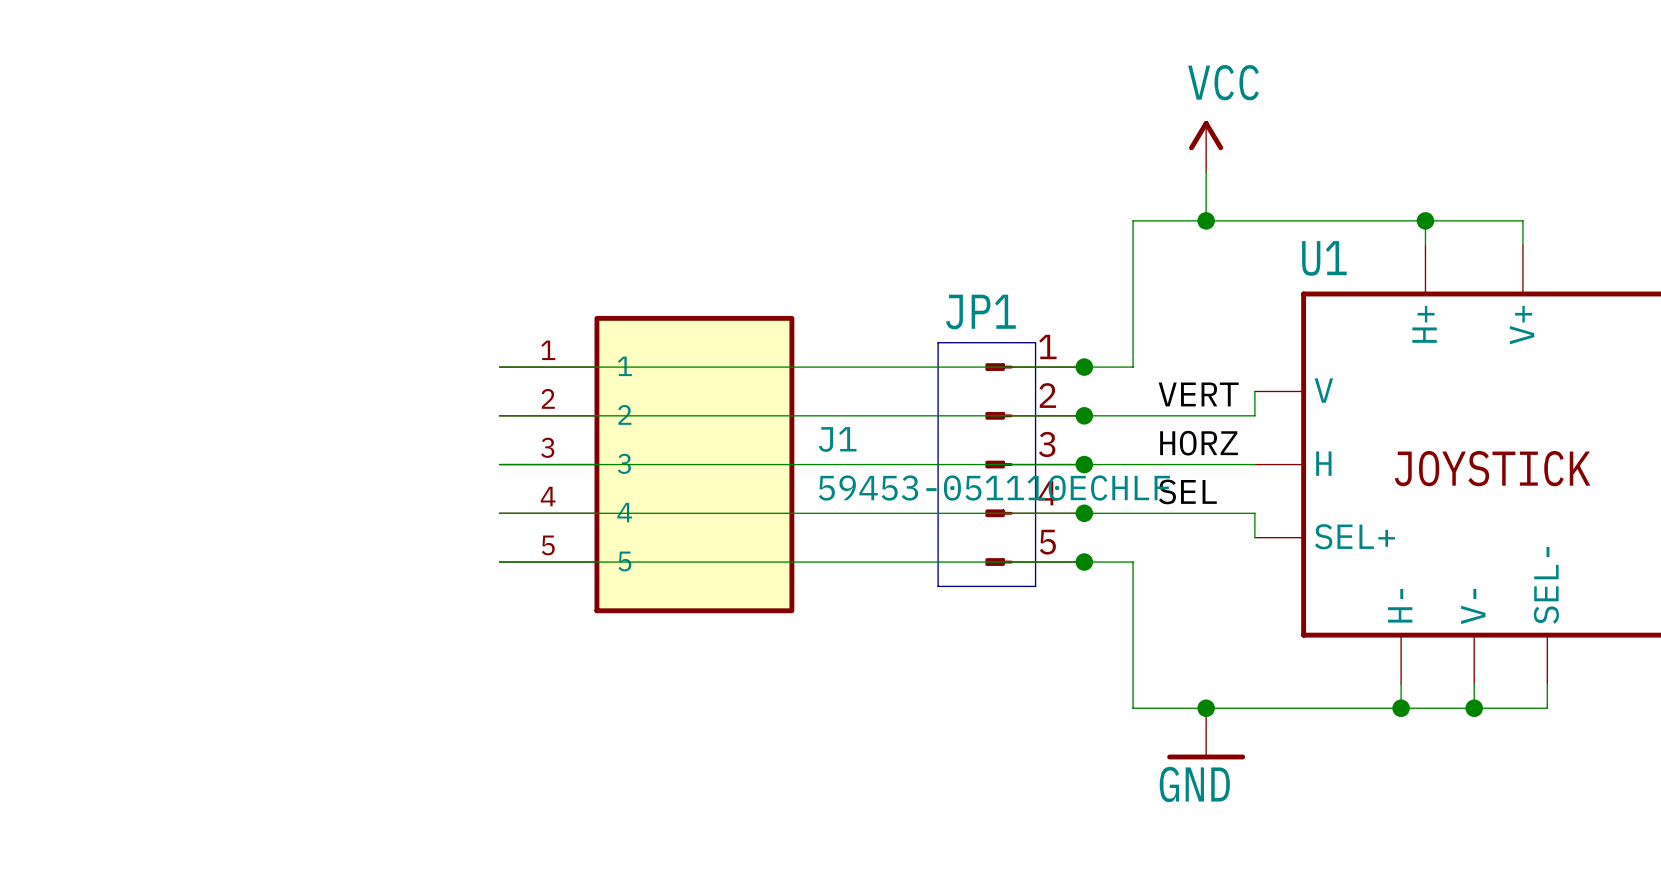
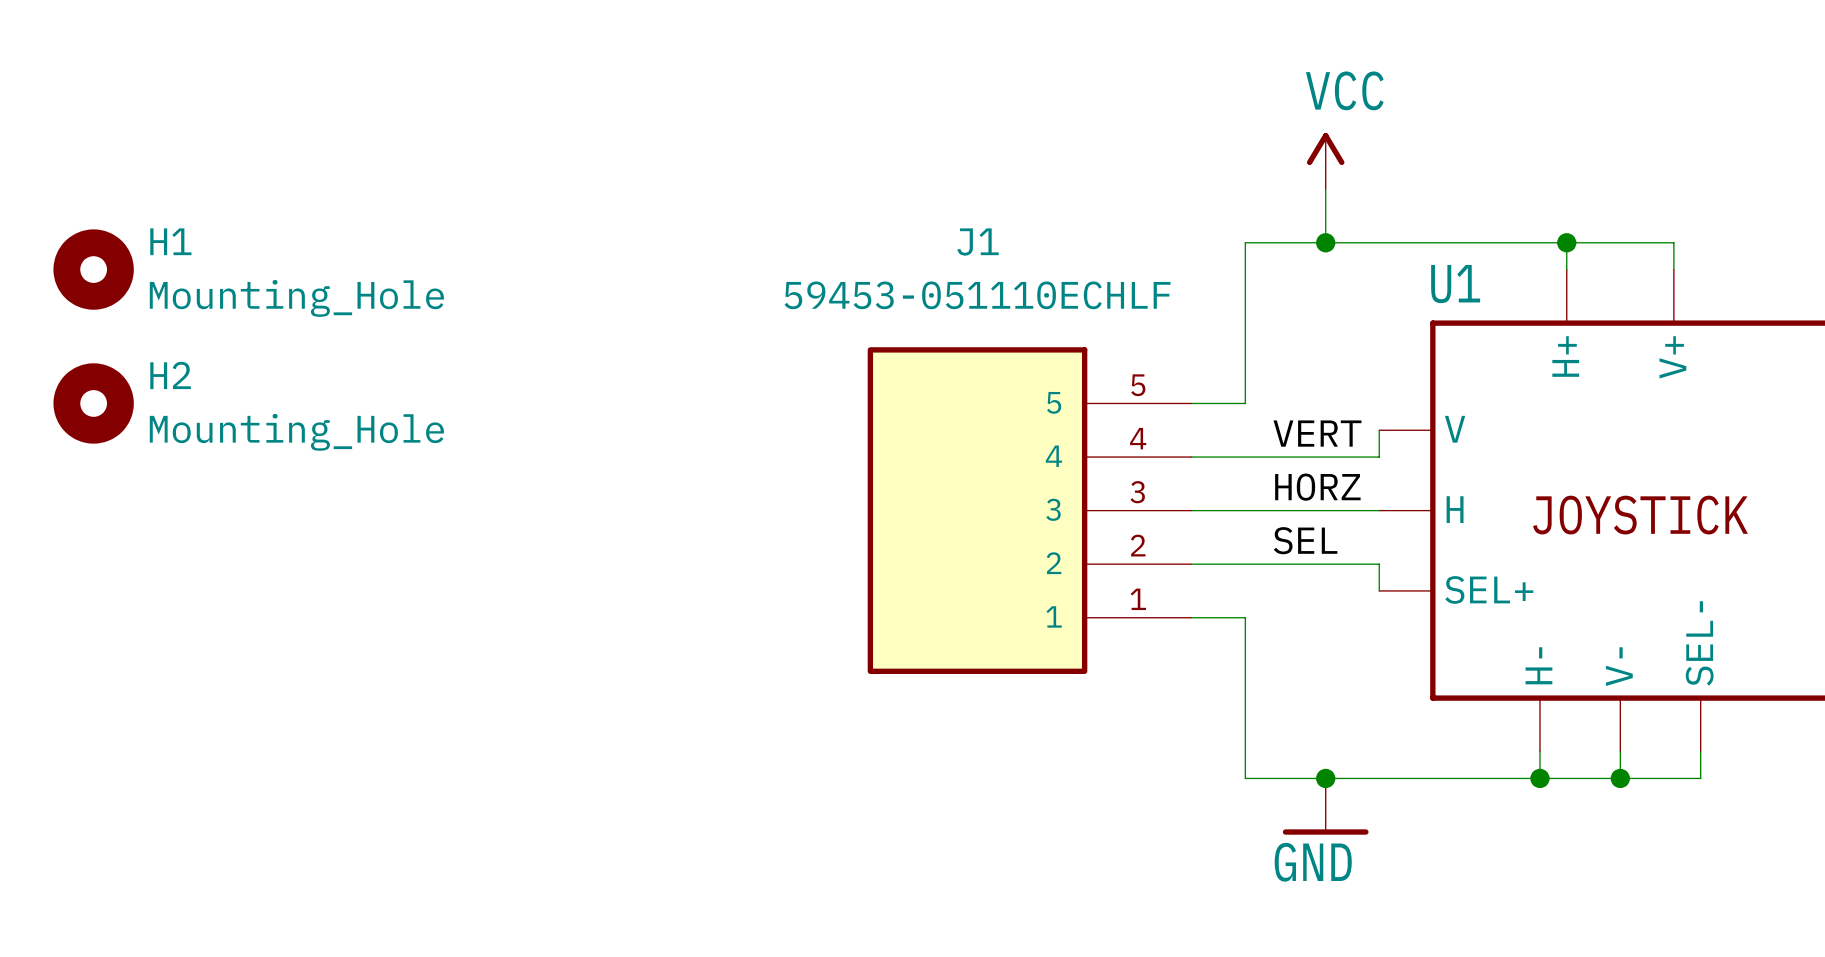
H1: none -> Mounting_Hole (93, 269)
line: (938, 342) (1035, 342) (1035, 586) (938, 586) (938, 342) -> none
H2: none -> Mounting_Hole (93, 403)
junction: (1084, 367) -> none
junction: (1084, 415) -> none
J1 name position: J1 (837, 439) -> J1 (978, 242)
J1 position: (646, 464) -> (1029, 510)
J1 rotation: 0° (694, 464) -> 180° (977, 510)
JP1: (1034, 464) -> none
junction: (1084, 464) -> none
J1 value position: 59453-051110ECHLF (994, 488) -> 59453-051110ECHLF (977, 295)
junction: (1084, 513) -> none
junction: (1084, 562) -> none

